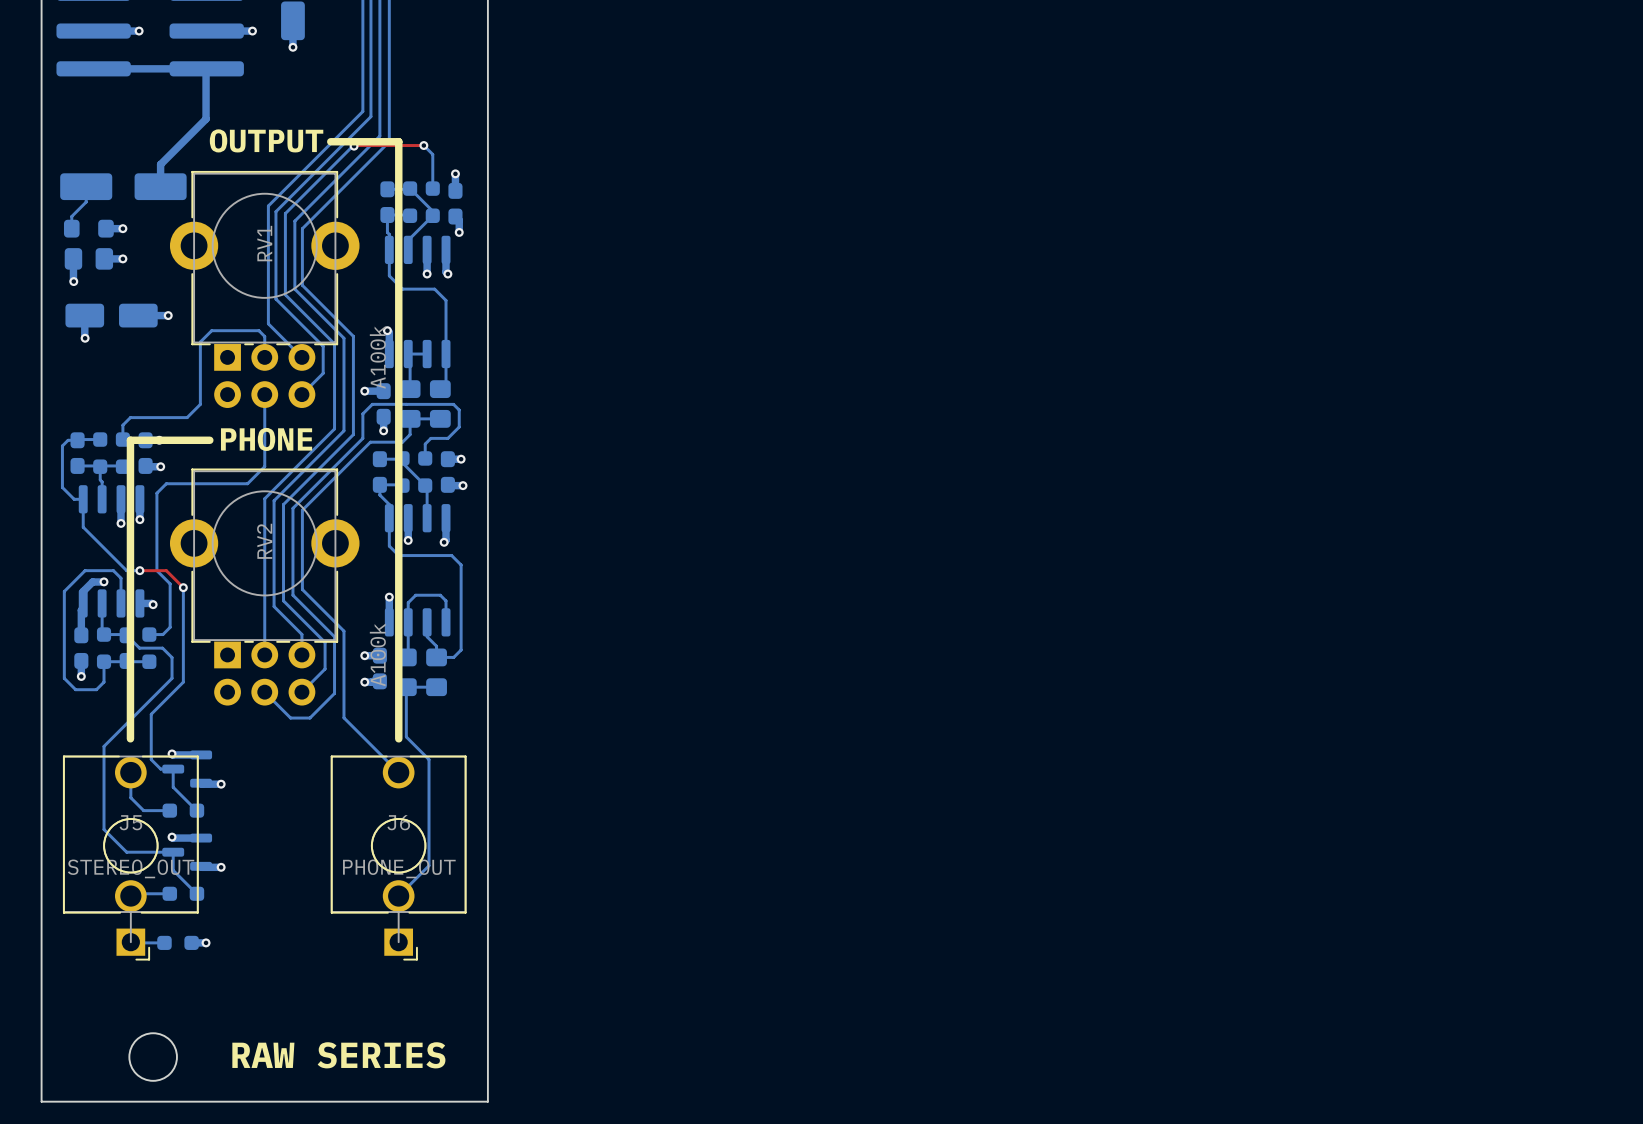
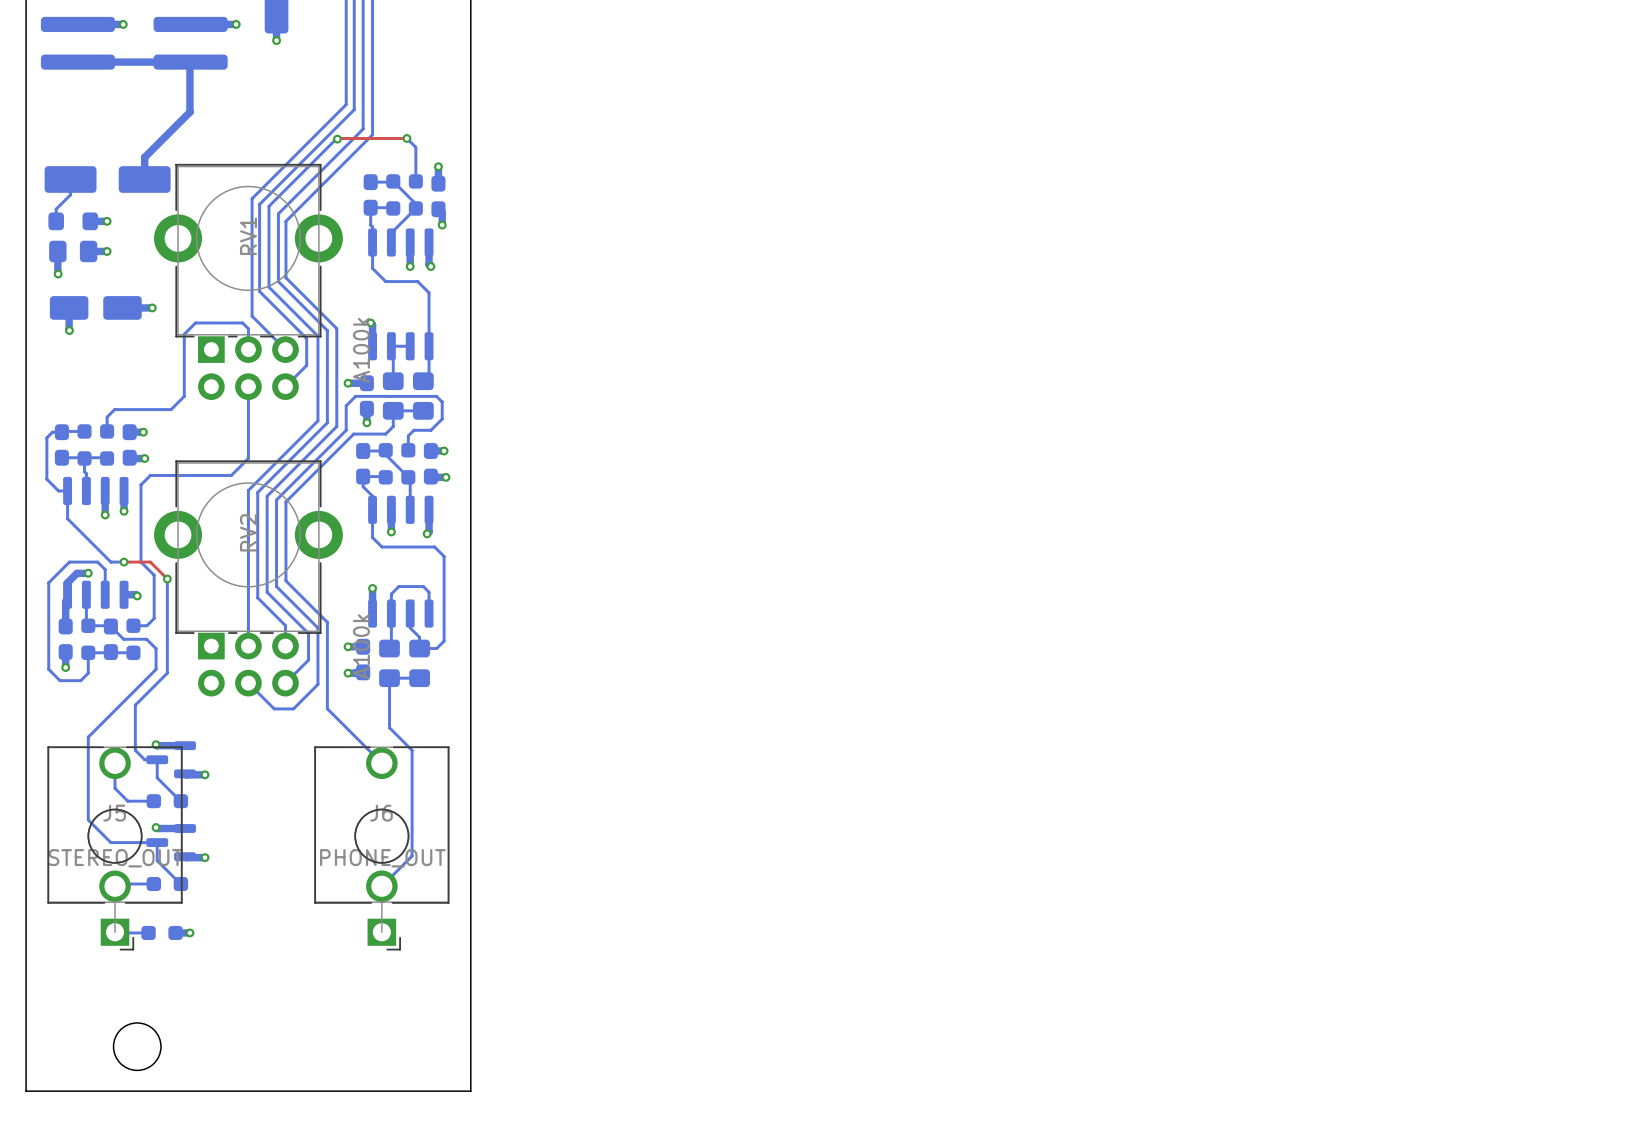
text: OUTPUT (266, 140) -> none
line: (330, 141) (398, 141) (398, 738) -> none
text: PHONE (266, 439) -> none
line: (209, 440) (130, 440) (130, 738) -> none
text: RAW SERIES (338, 1055) -> none

